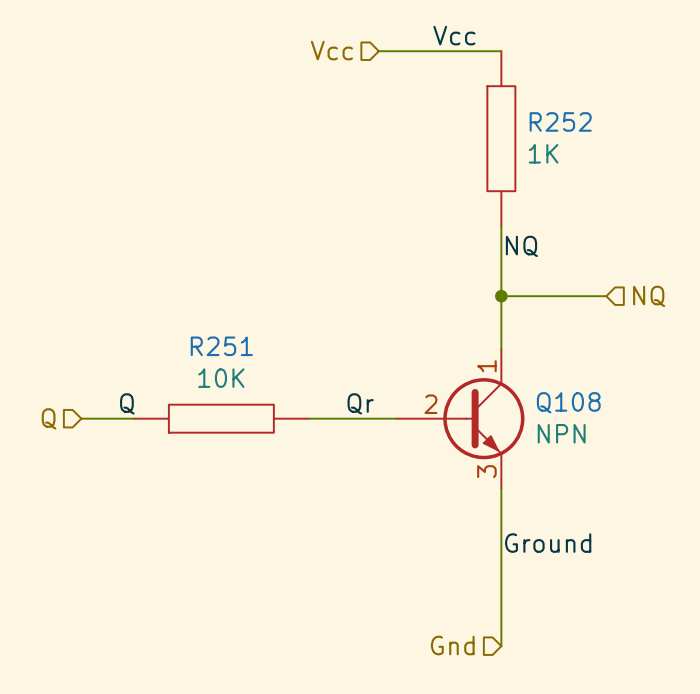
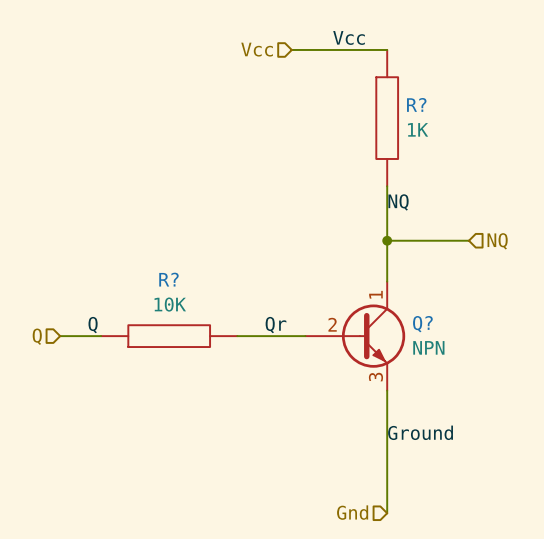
R252 name: R252 (560, 121) -> R? (416, 104)
R251 name: R251 (221, 346) -> R? (168, 279)
Q108 name: Q108 (568, 402) -> Q? (422, 324)

